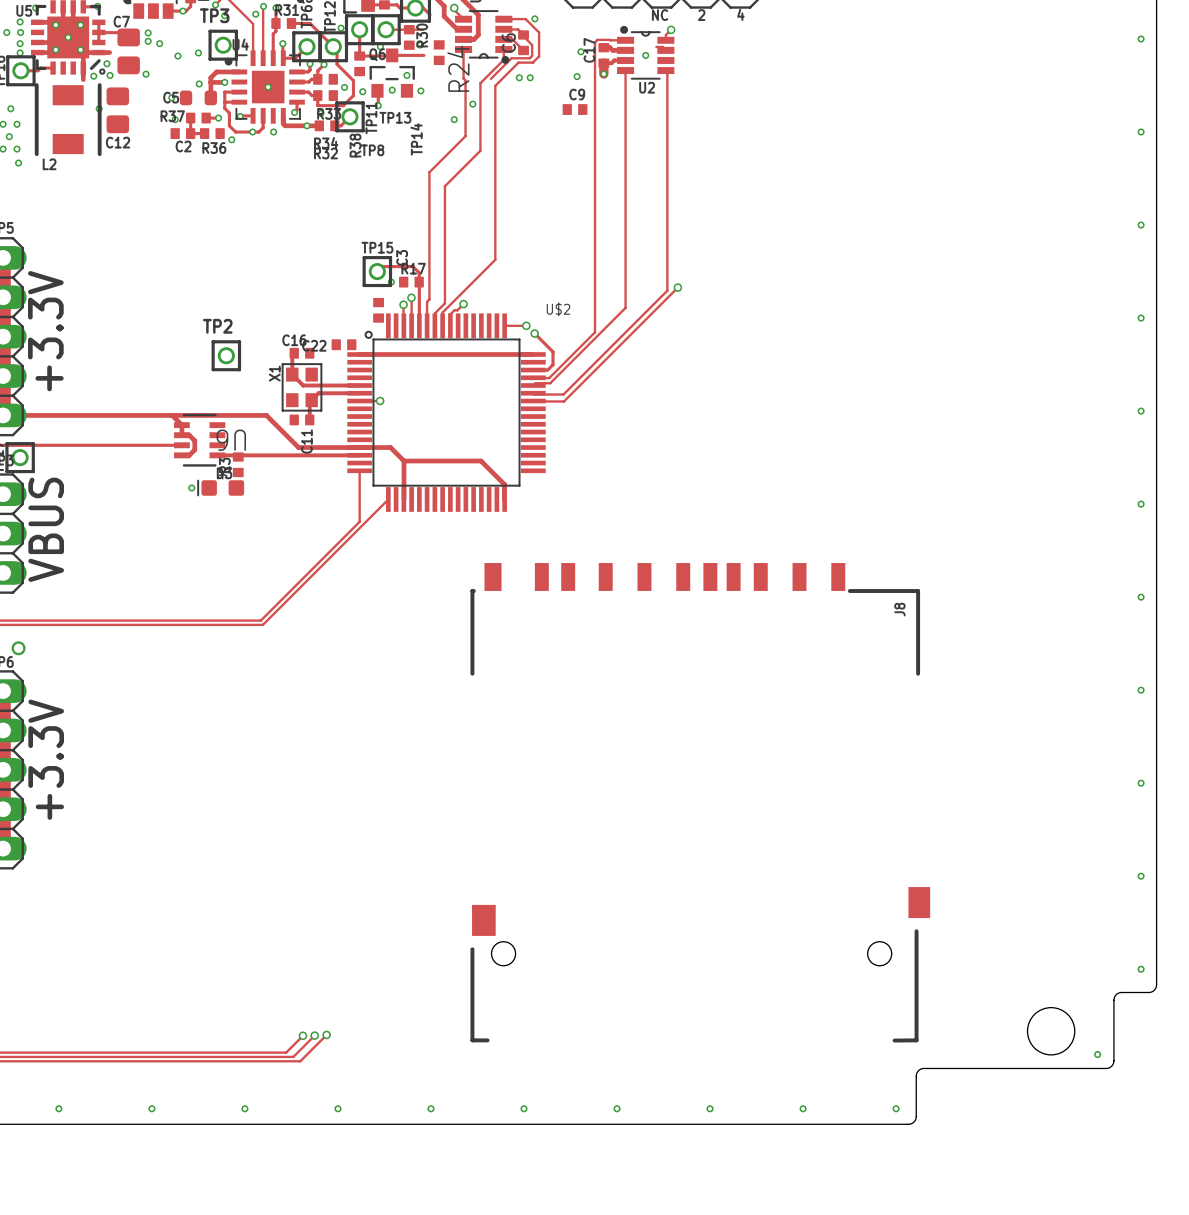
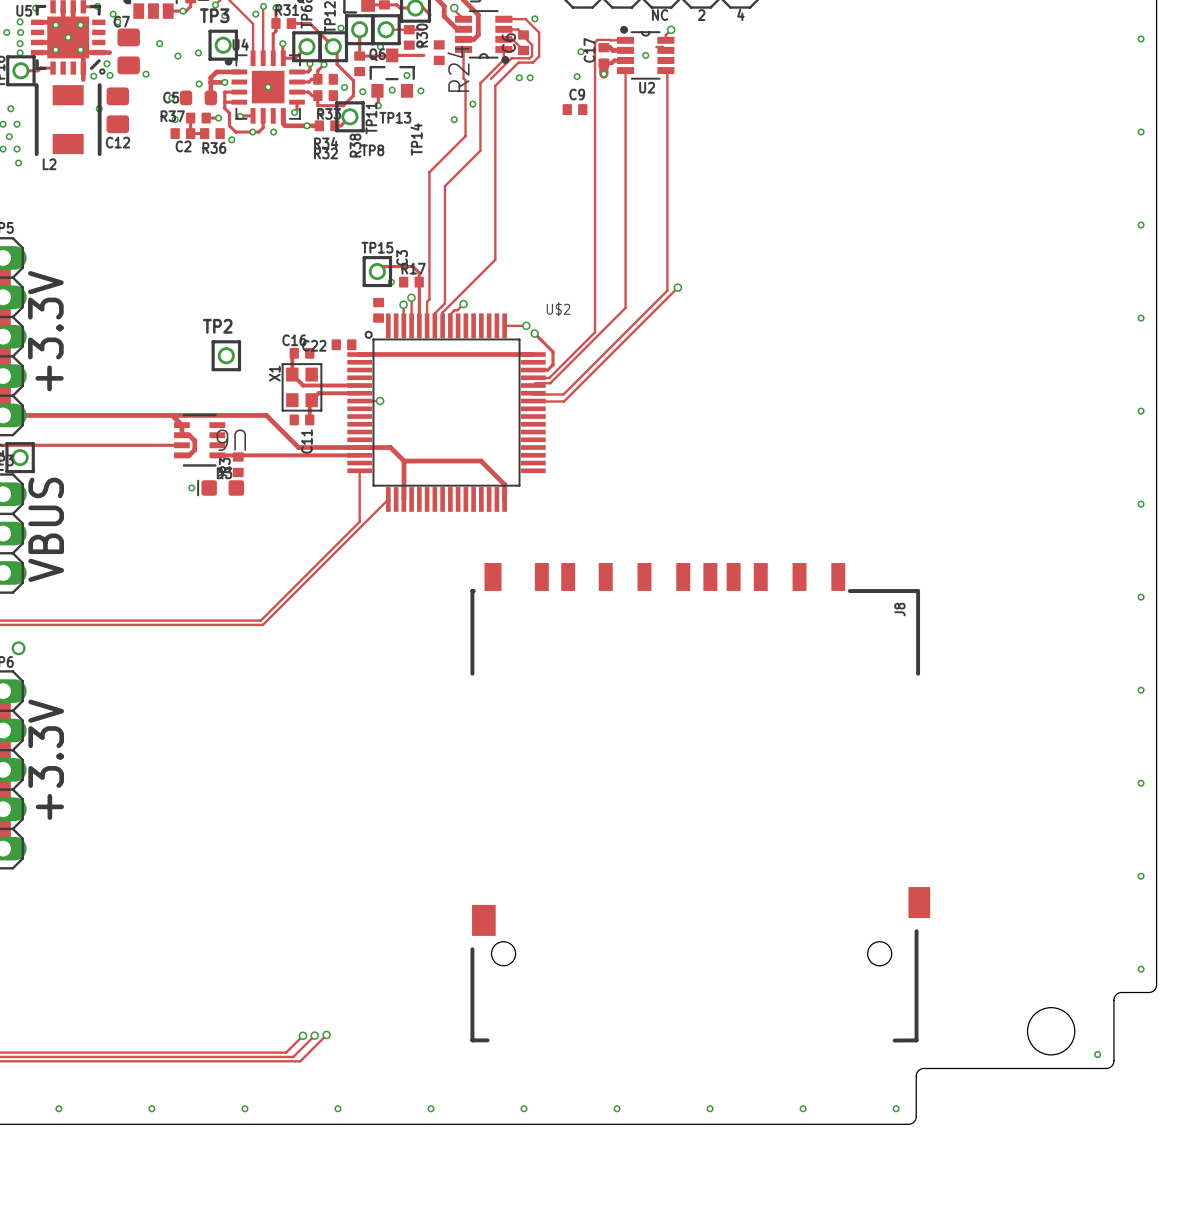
via: none -> (113, 14)
via: none -> (117, 21)
track: (98, 22) (98, 42) -> none
track: (98, 32) (121, 32) -> none
via: (148, 32) -> none
via: (148, 41) -> none

